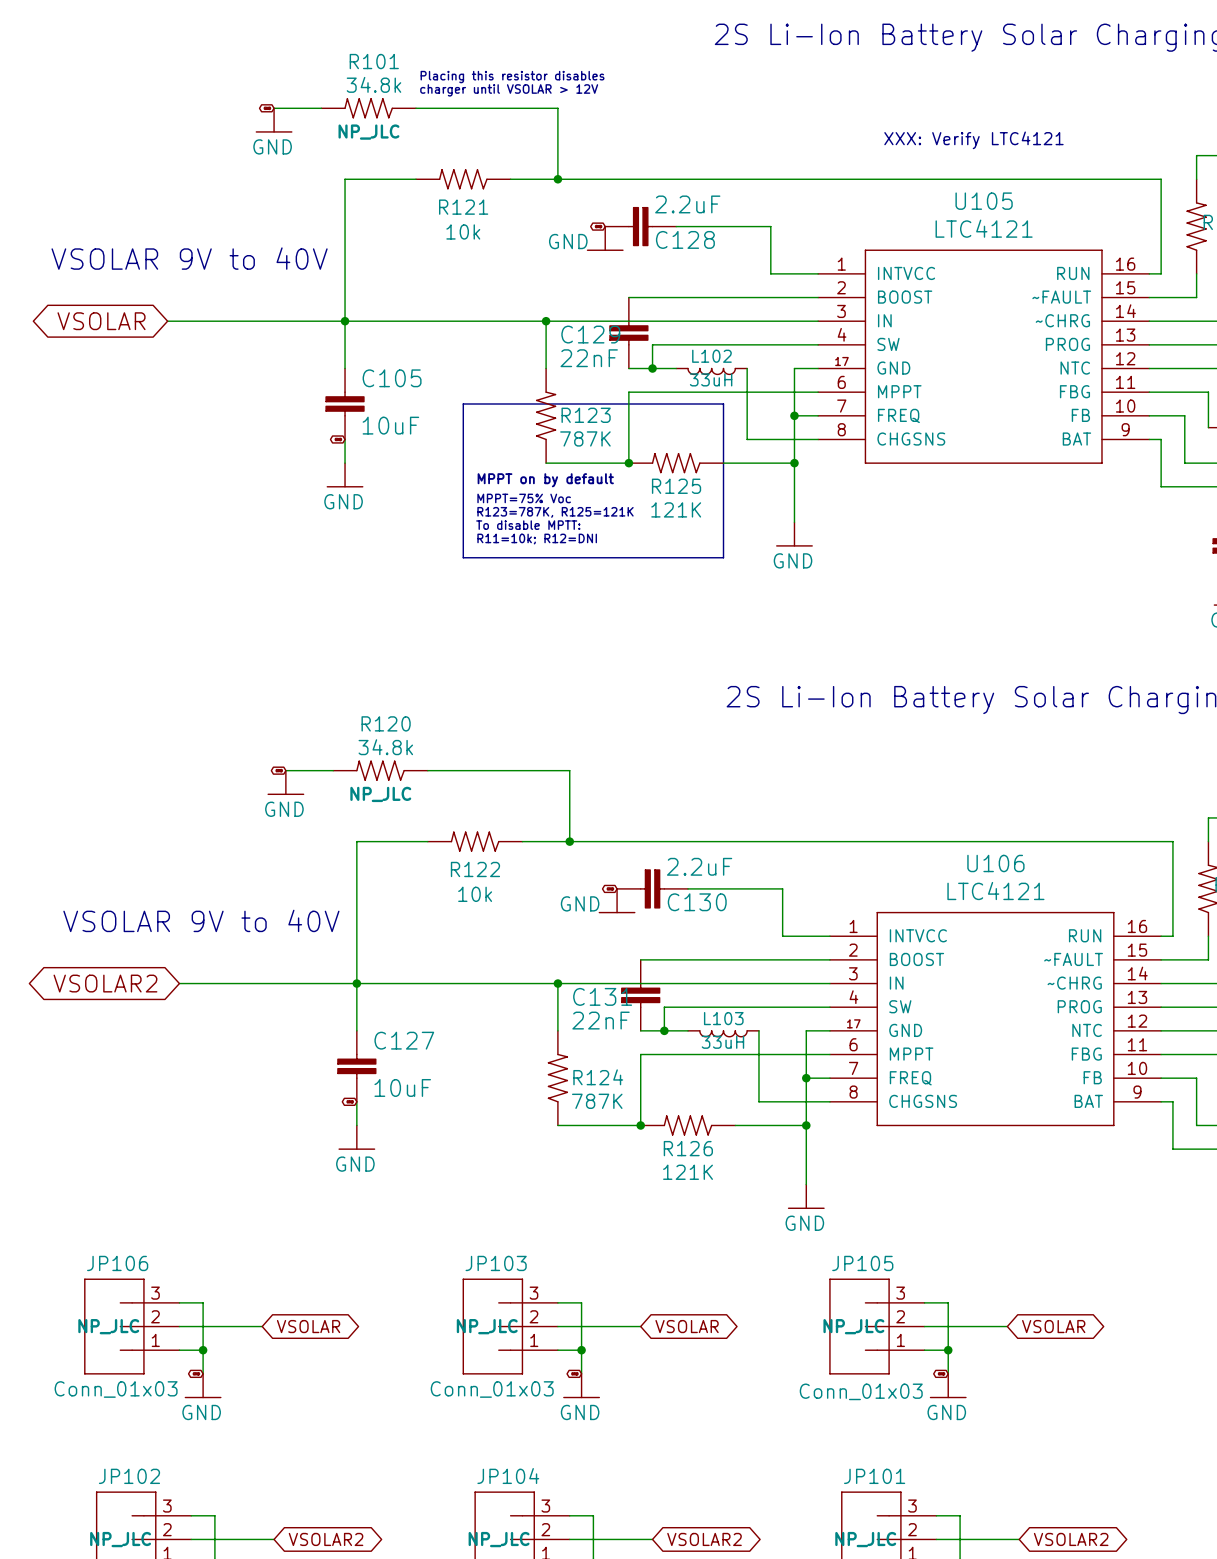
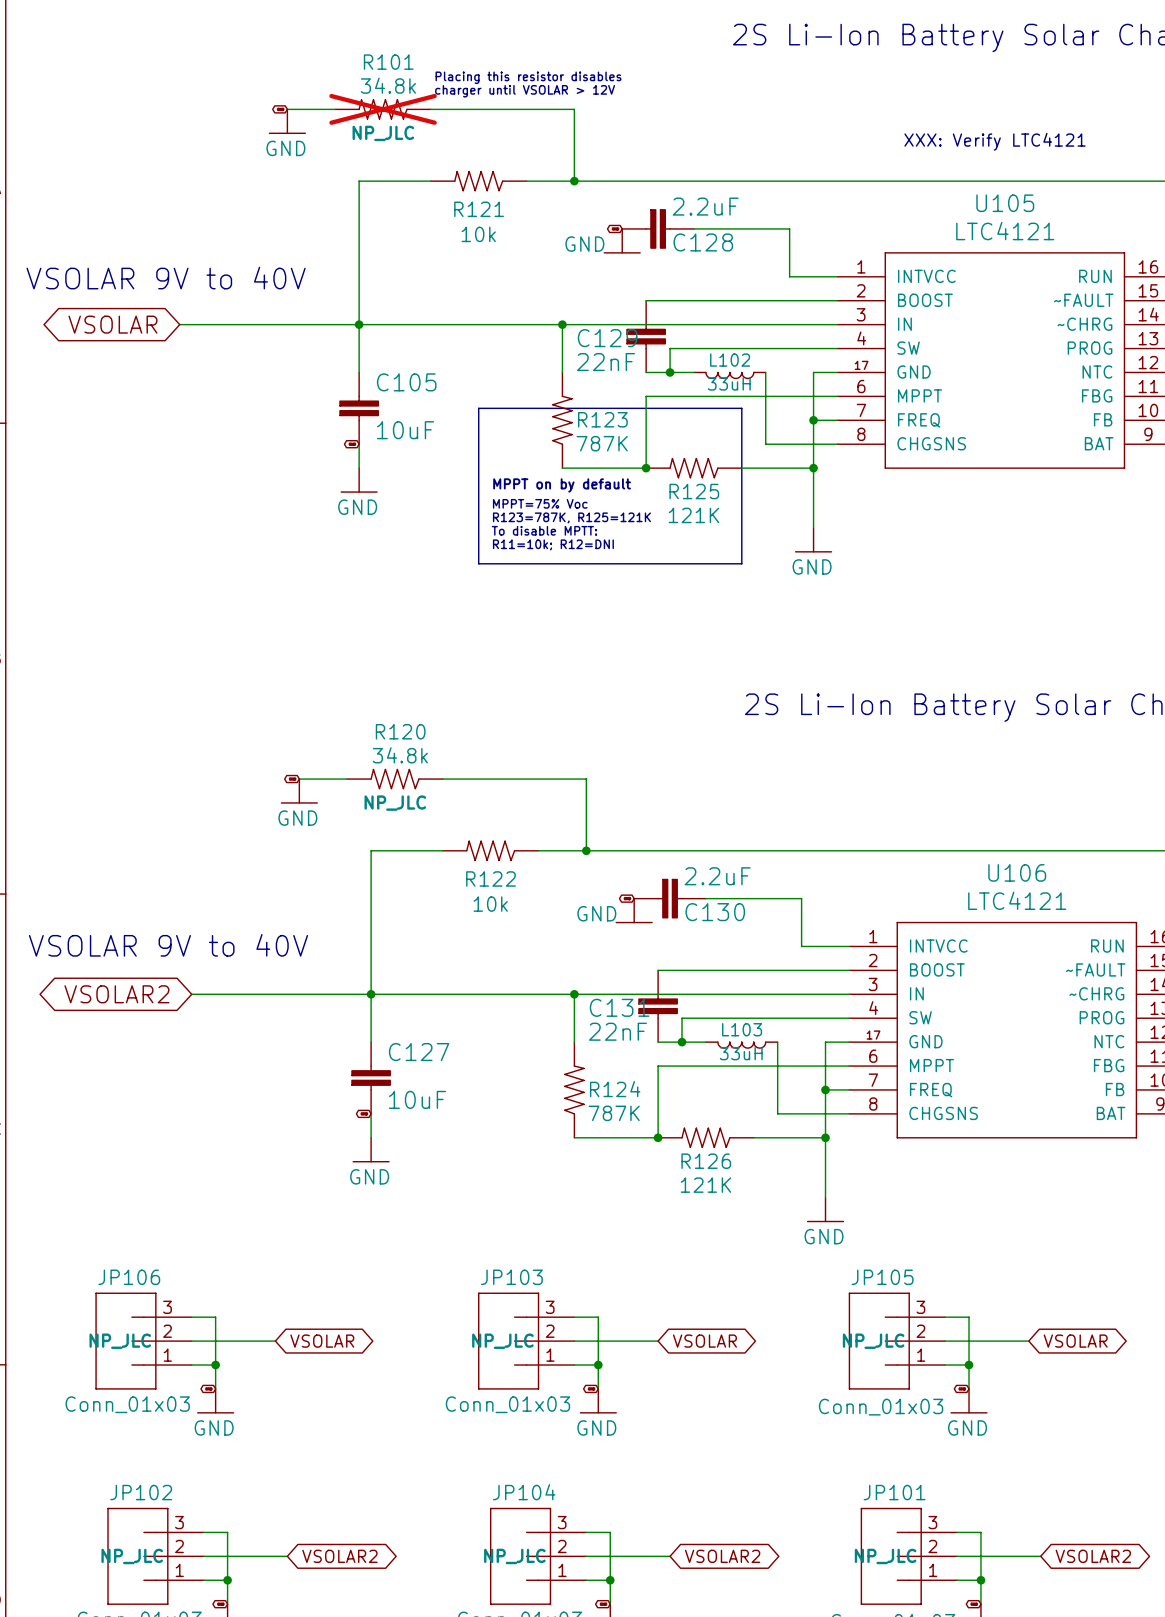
R101 do-not-place cross: none -> (383, 109)
text position: VSOLAR 9V to 40V (189, 258) -> VSOLAR 9V to 40V (166, 278)
text position: VSOLAR 9V to 40V (201, 920) -> VSOLAR 9V to 40V (168, 945)

